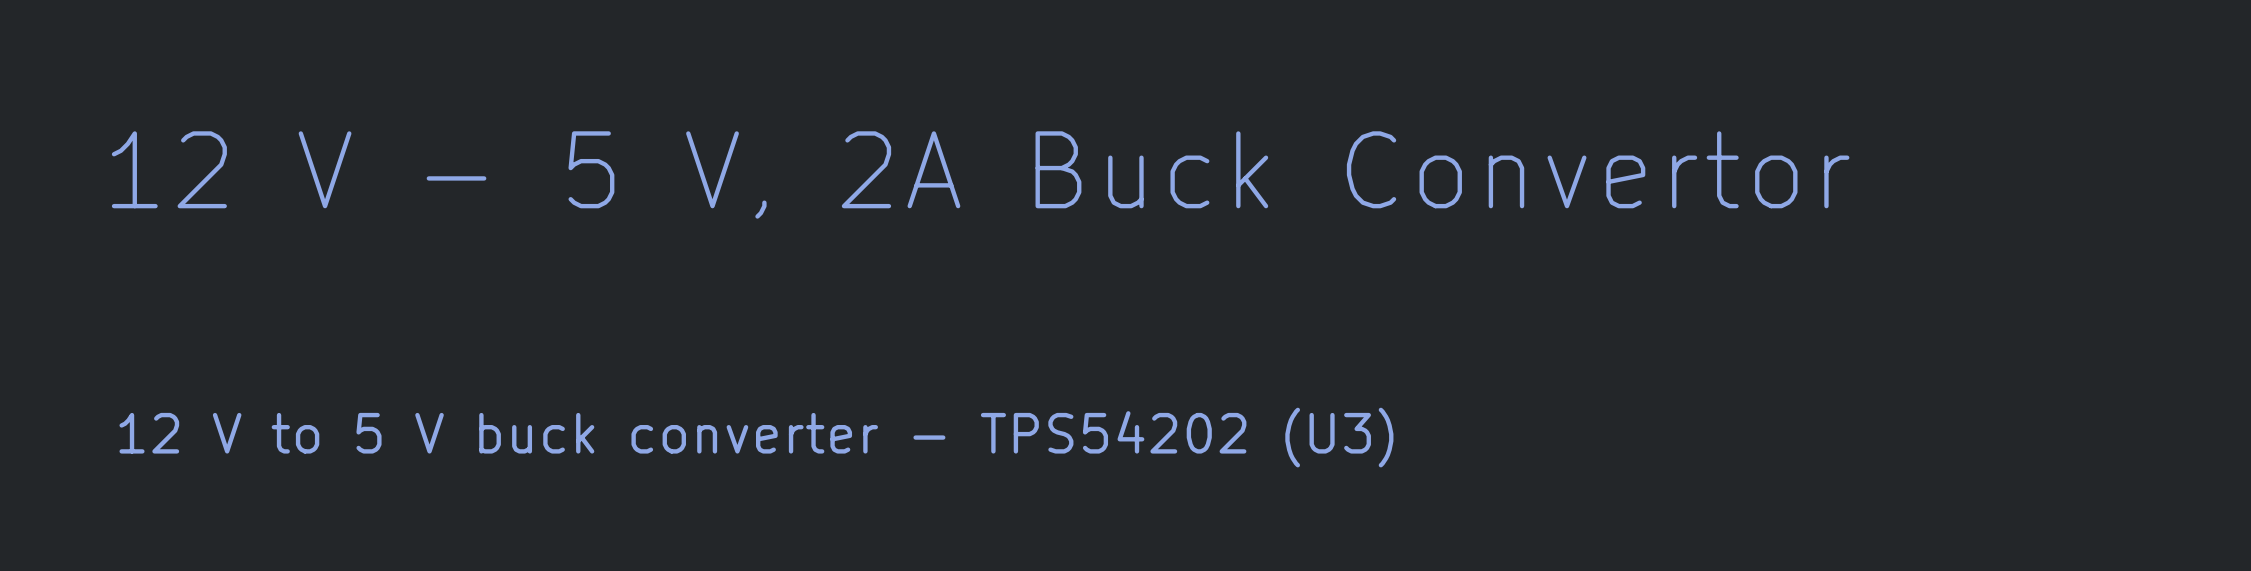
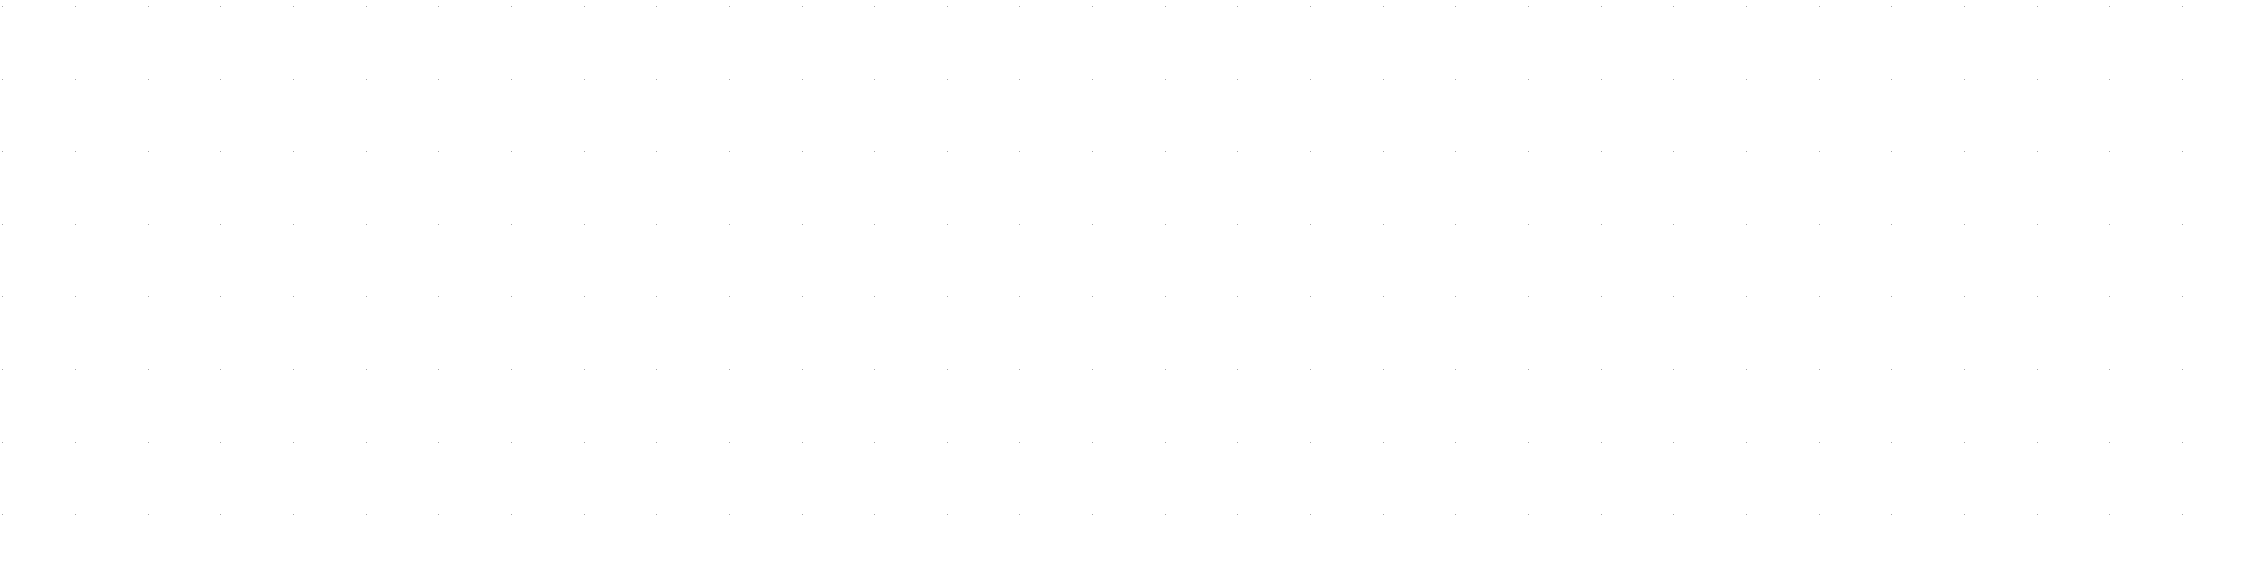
text: 12 V - 5 V, 2A Buck Convertor (980, 174) -> none
text: 12 V to 5 V buck converter - TPS54202 (U3) (756, 437) -> none

